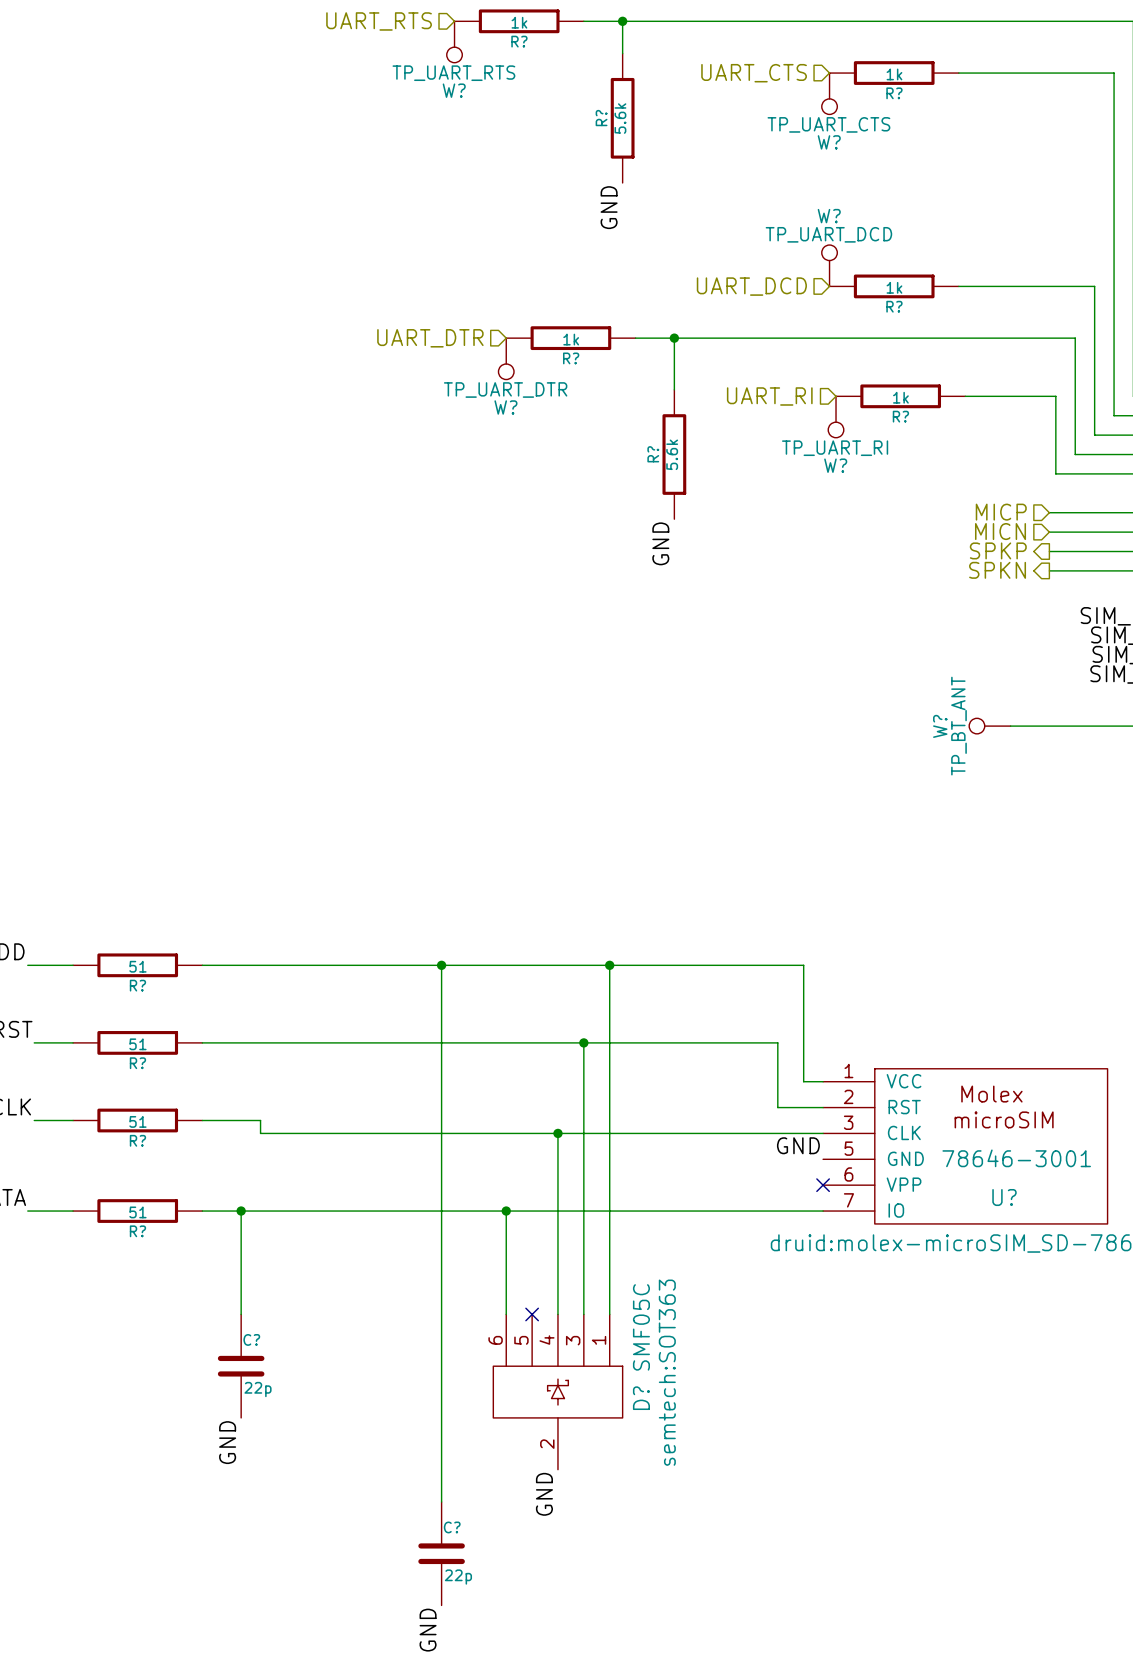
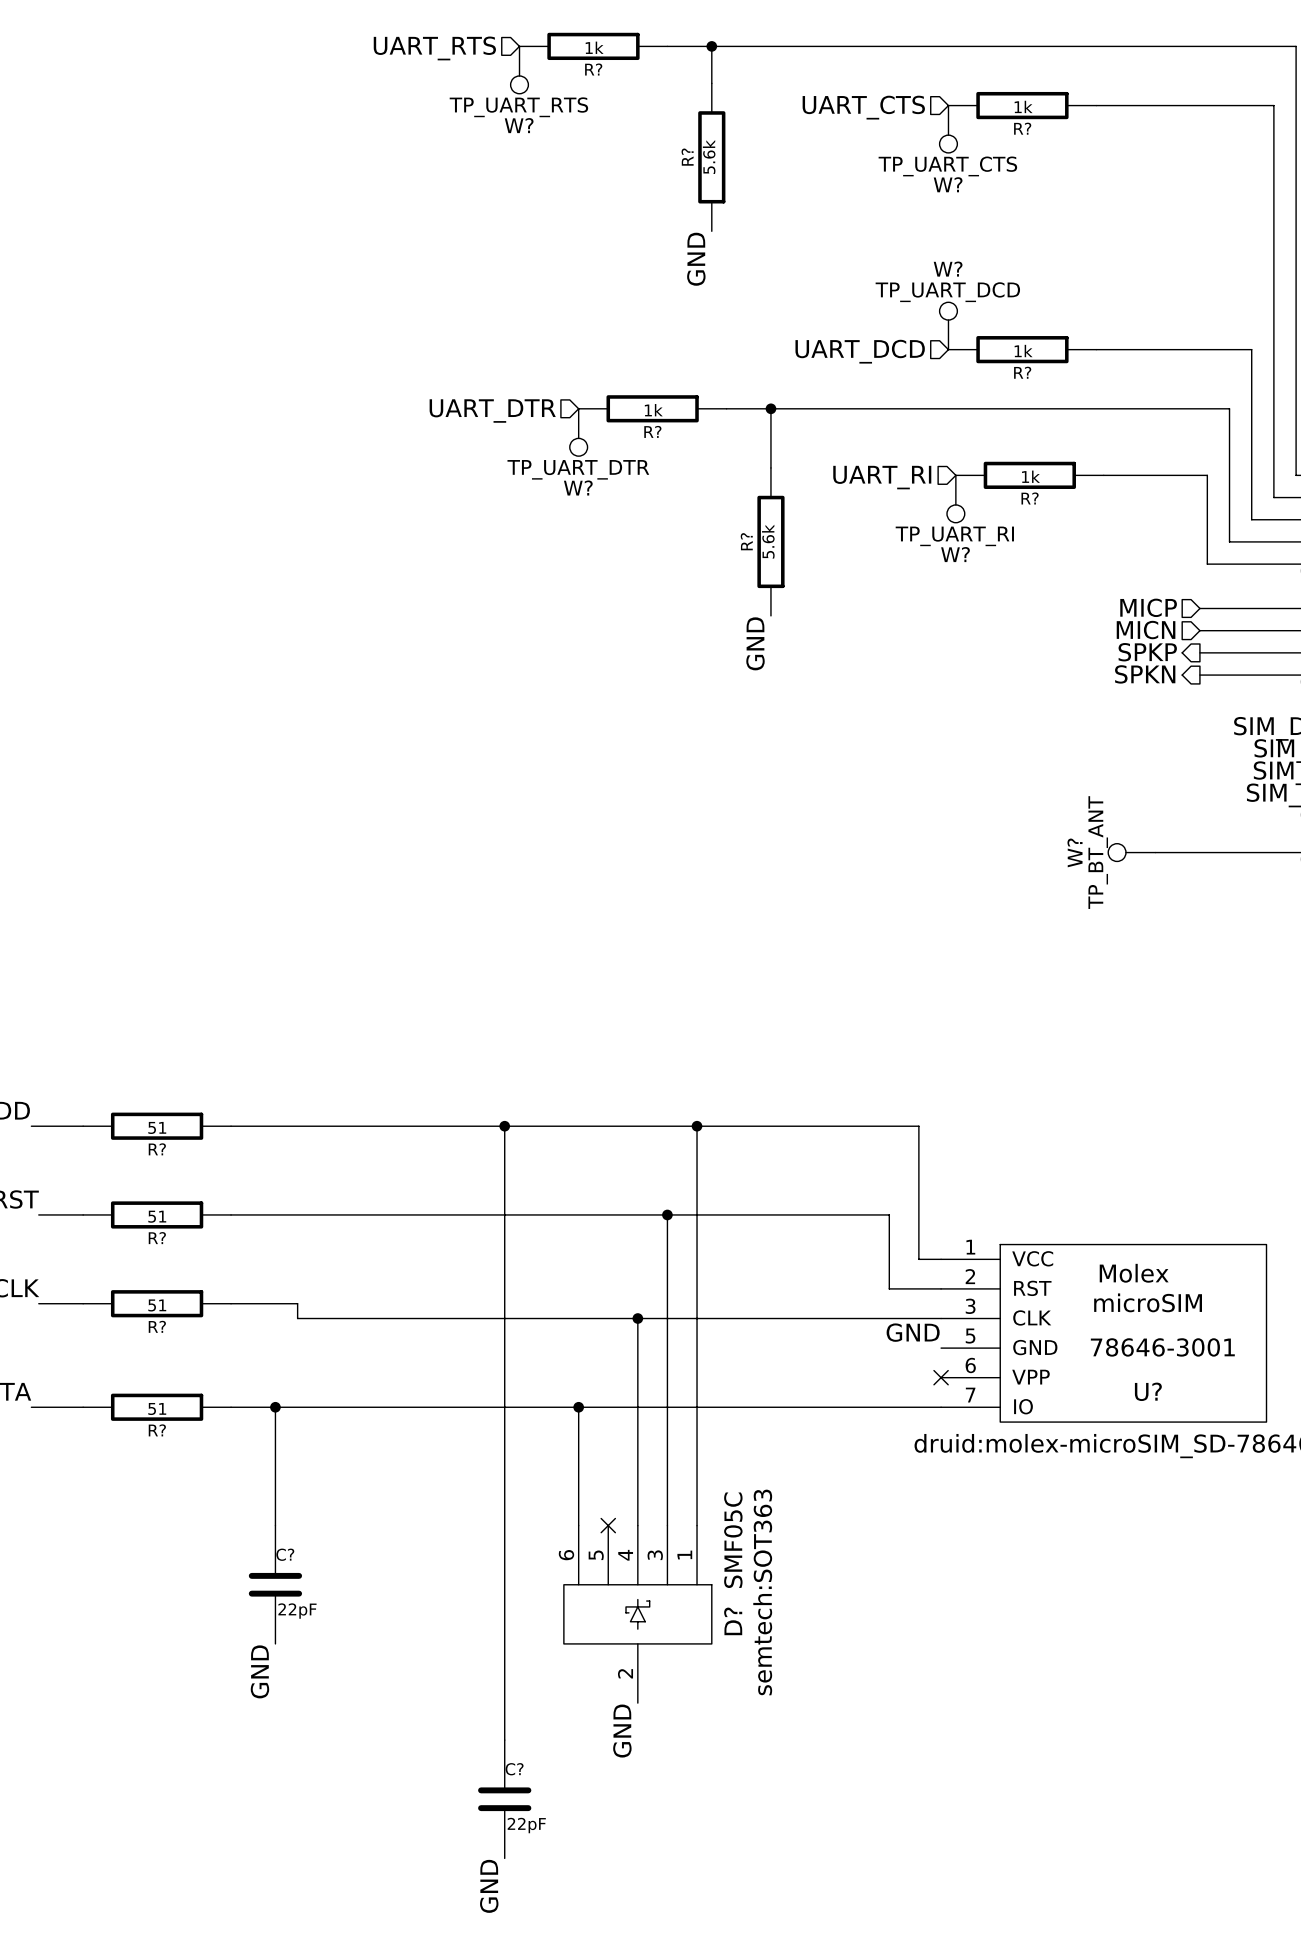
C? value: 22p (258, 1389) -> 22pF (297, 1611)
C? value: 22p (458, 1577) -> 22pF (526, 1825)

